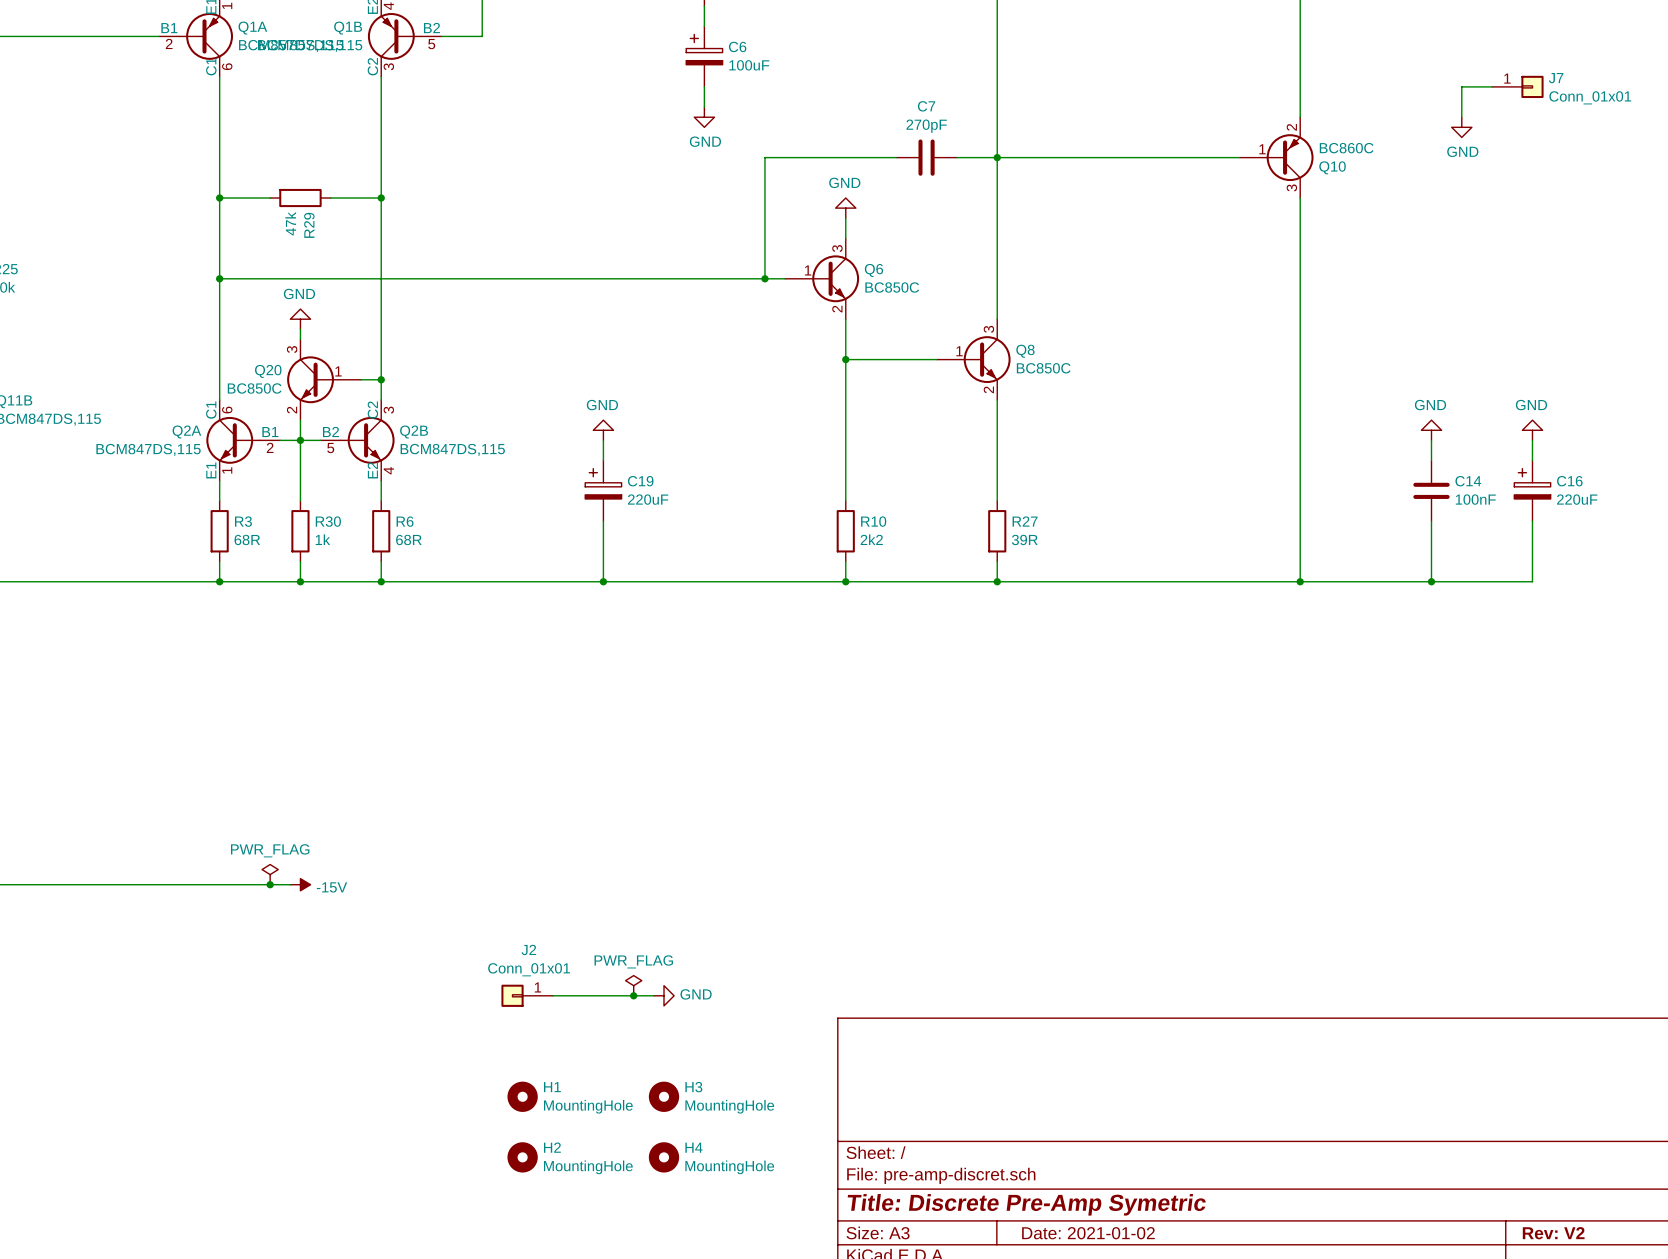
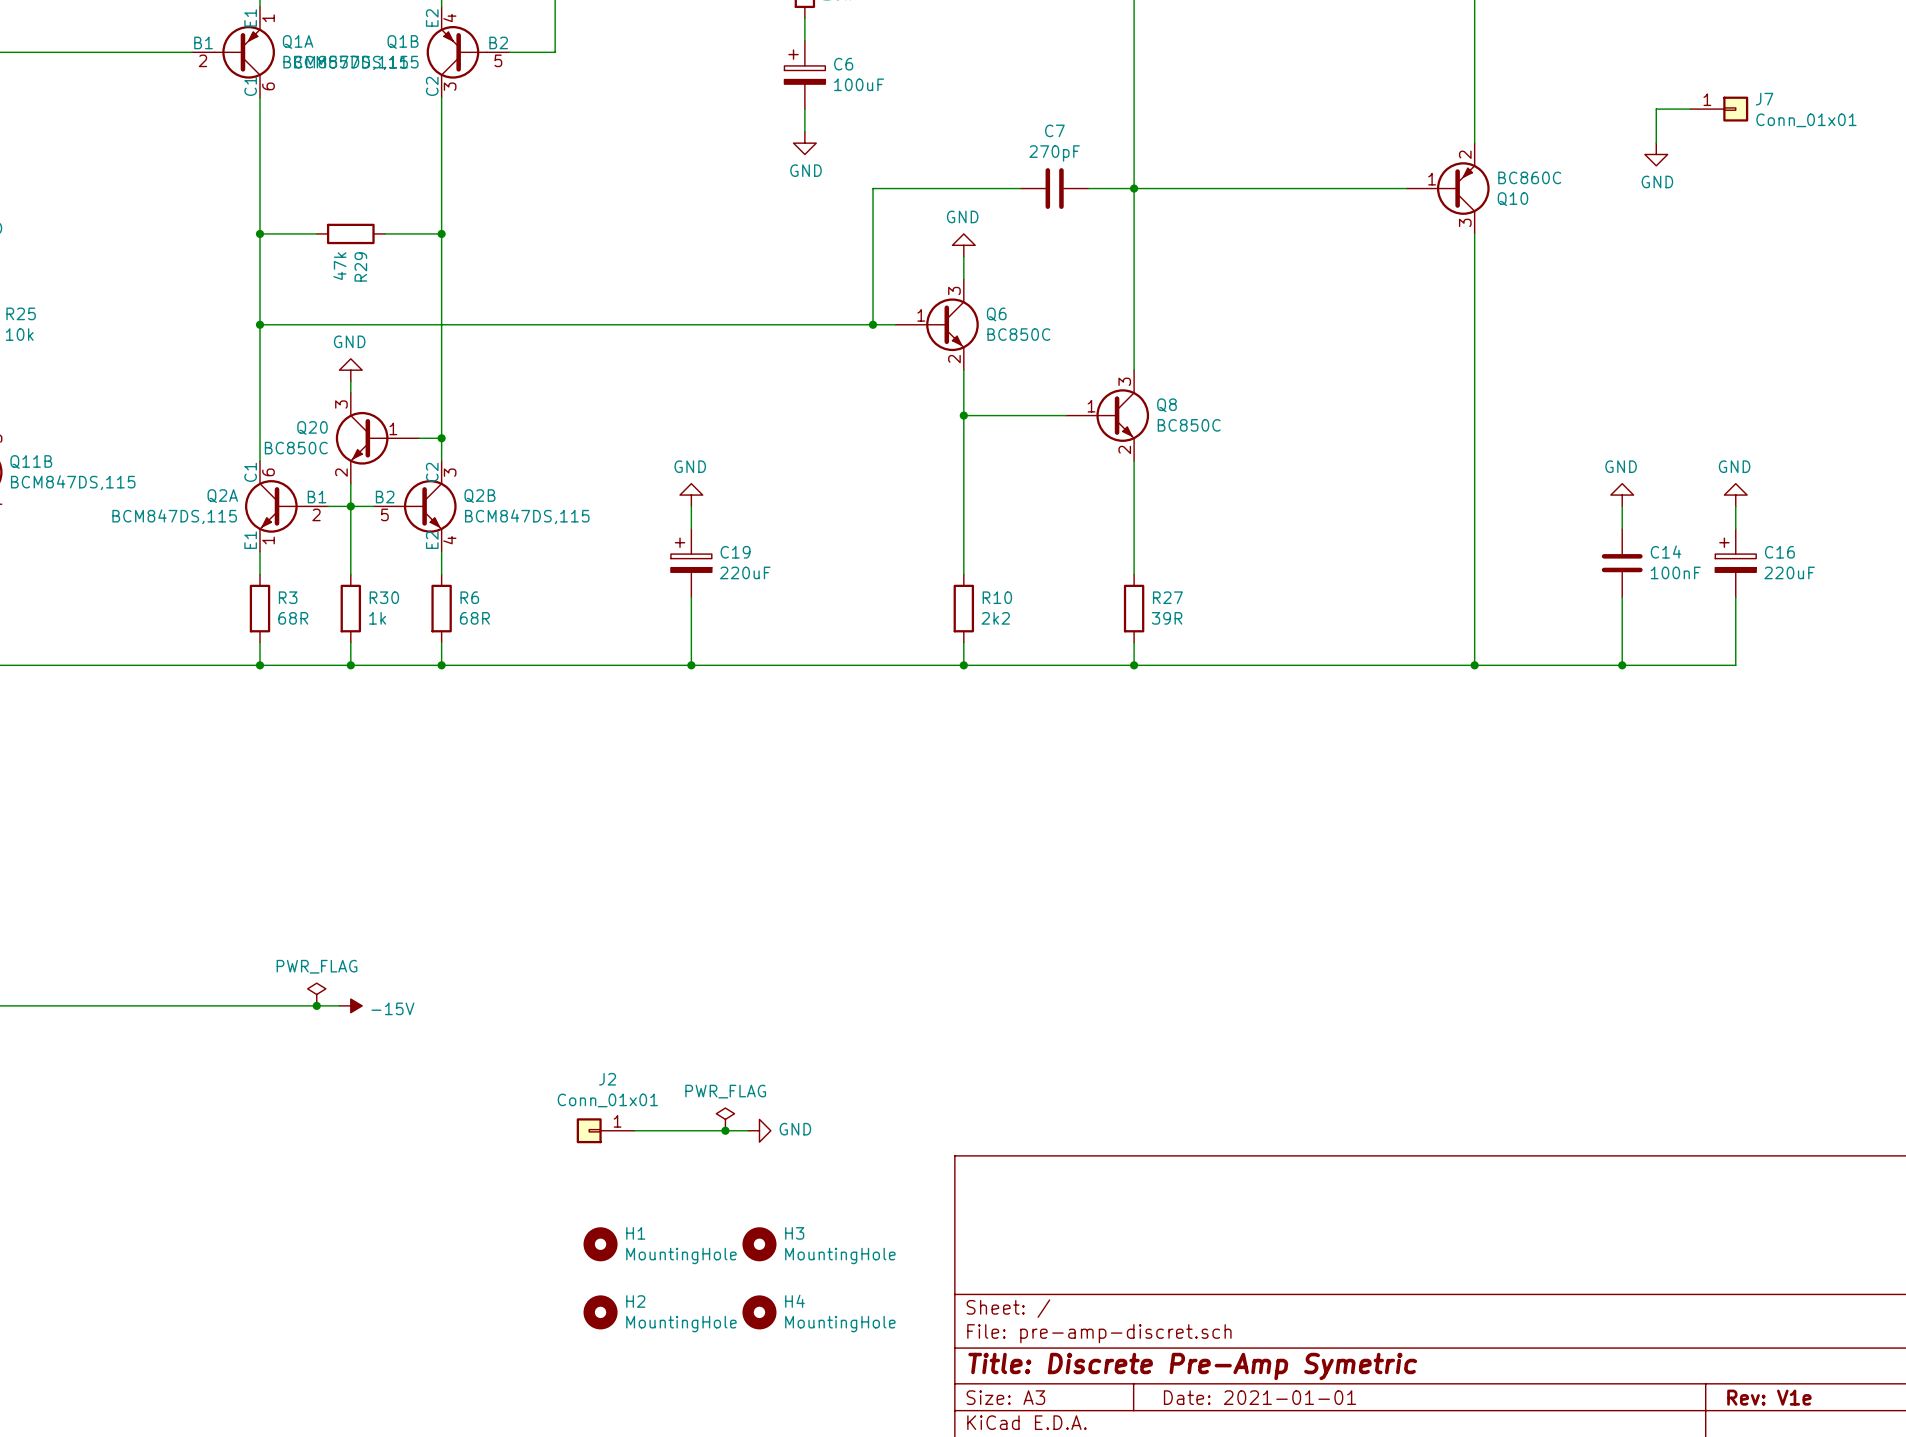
title block: Date: 2021-01-02 (1088, 1233) -> Date: 2021-01-01 (1259, 1397)
title block: Rev: V2 (1553, 1233) -> Rev: V1e (1769, 1397)

